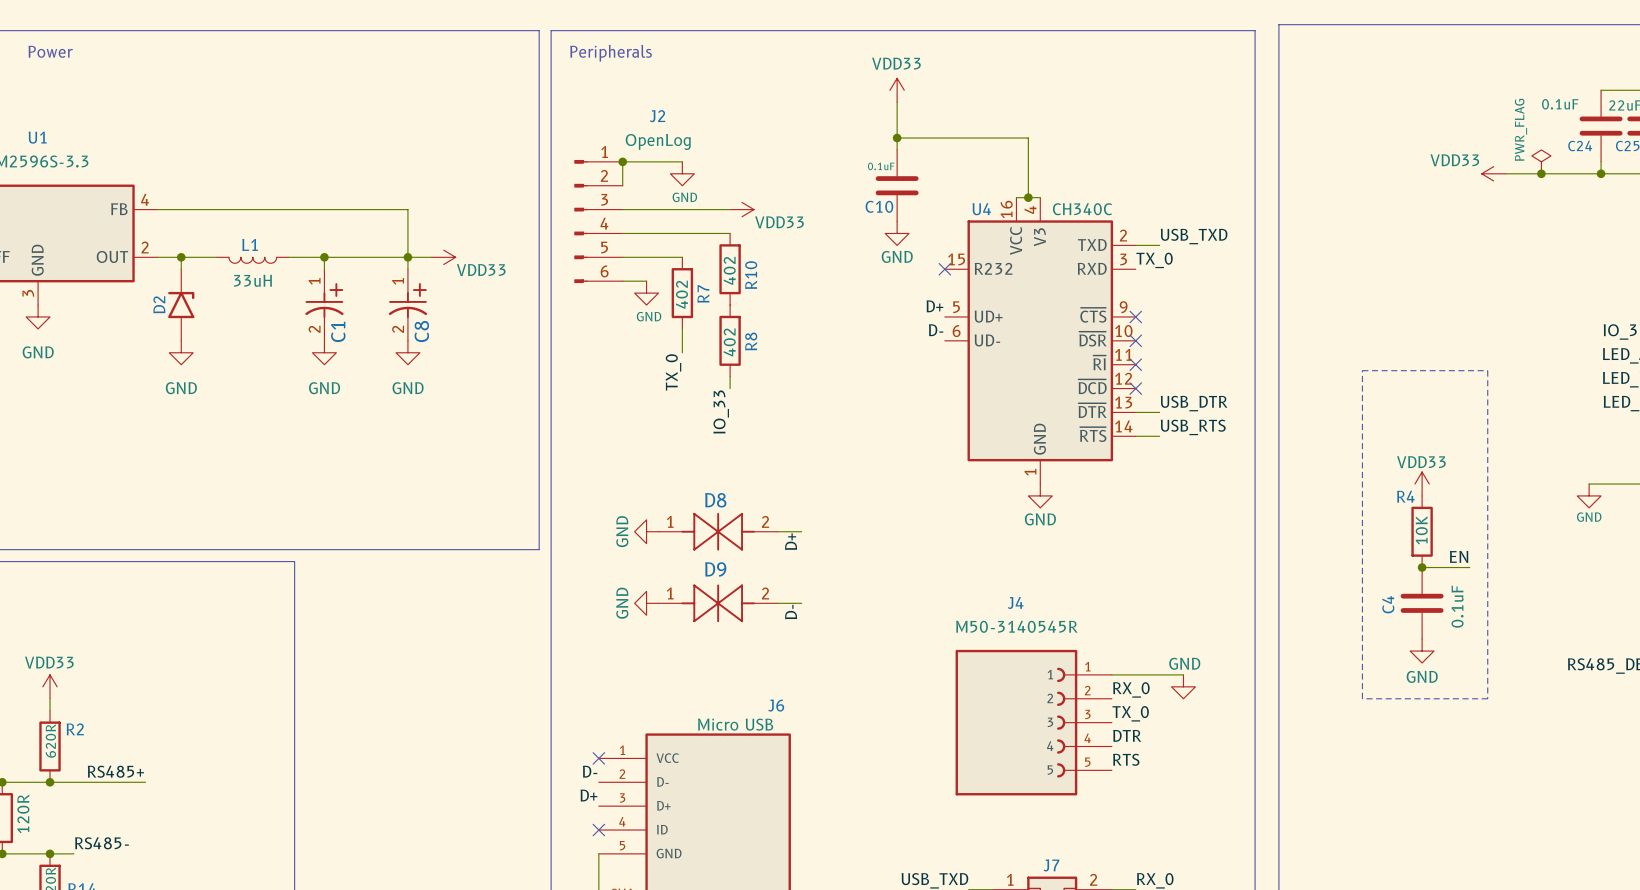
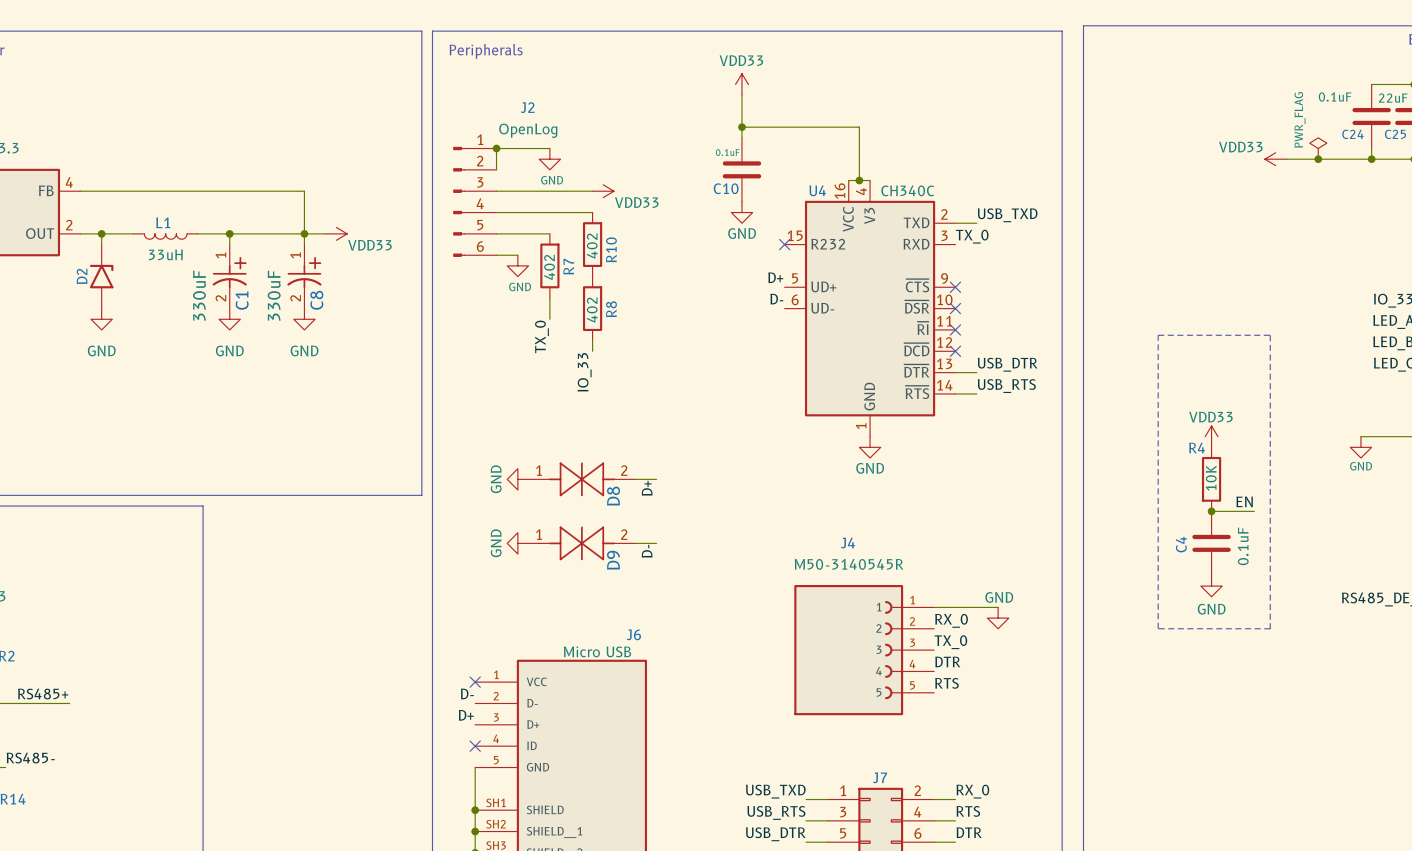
C1 value: none -> 330uF (199, 295)
C8 value: none -> 330uF (274, 295)
D8 name rotation: 0° (715, 500) -> 90° counterclockwise (613, 496)
D8 name position: D8 (715, 500) -> D8 (613, 496)
D9 name rotation: 0° (715, 569) -> 90° counterclockwise (613, 560)
D9 name position: D9 (715, 569) -> D9 (613, 560)

